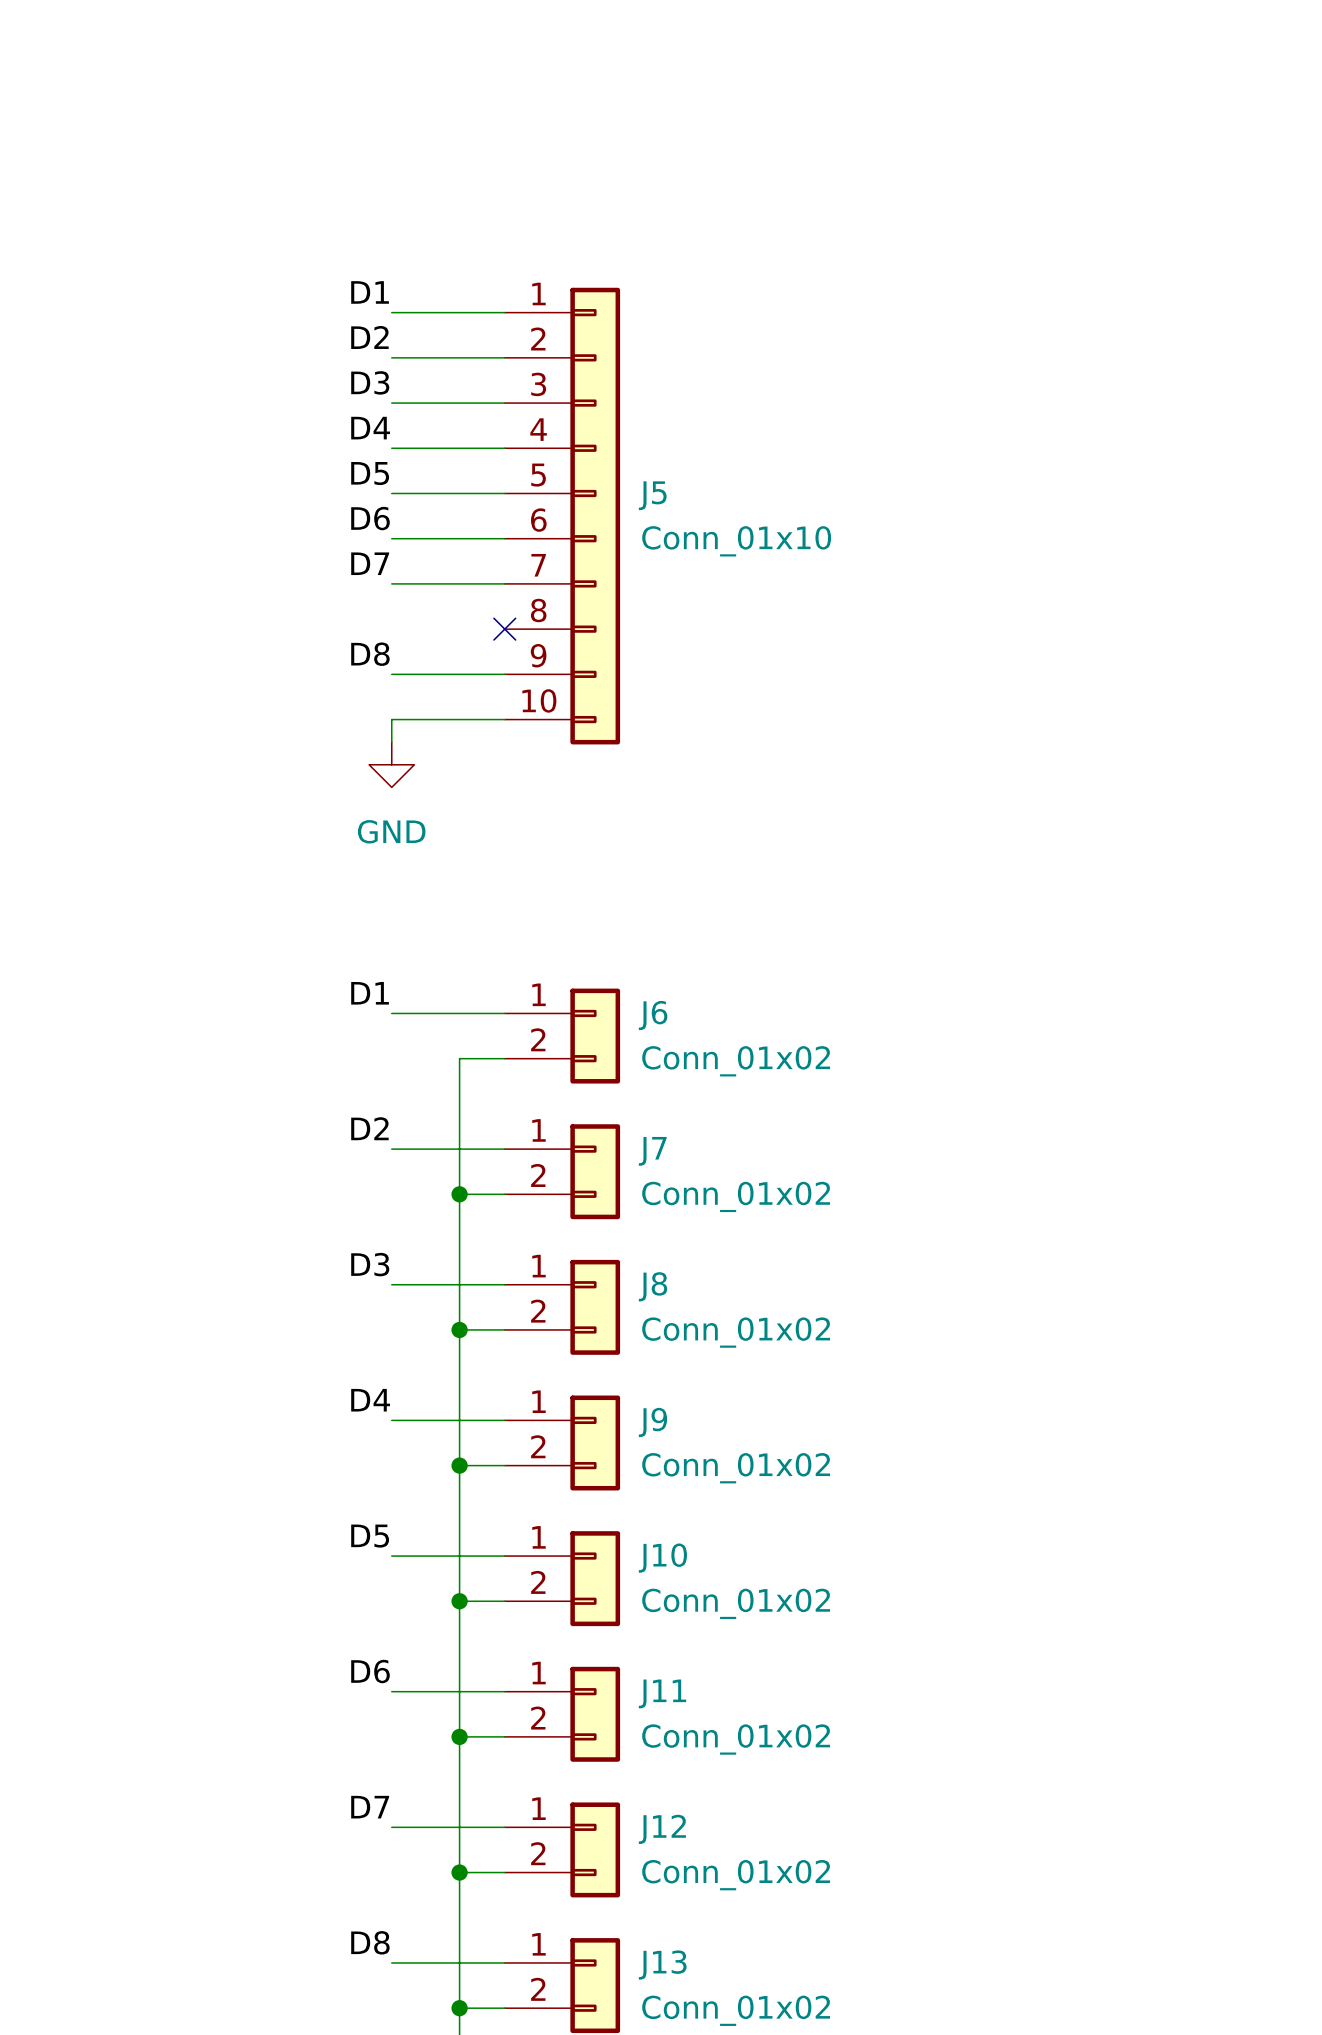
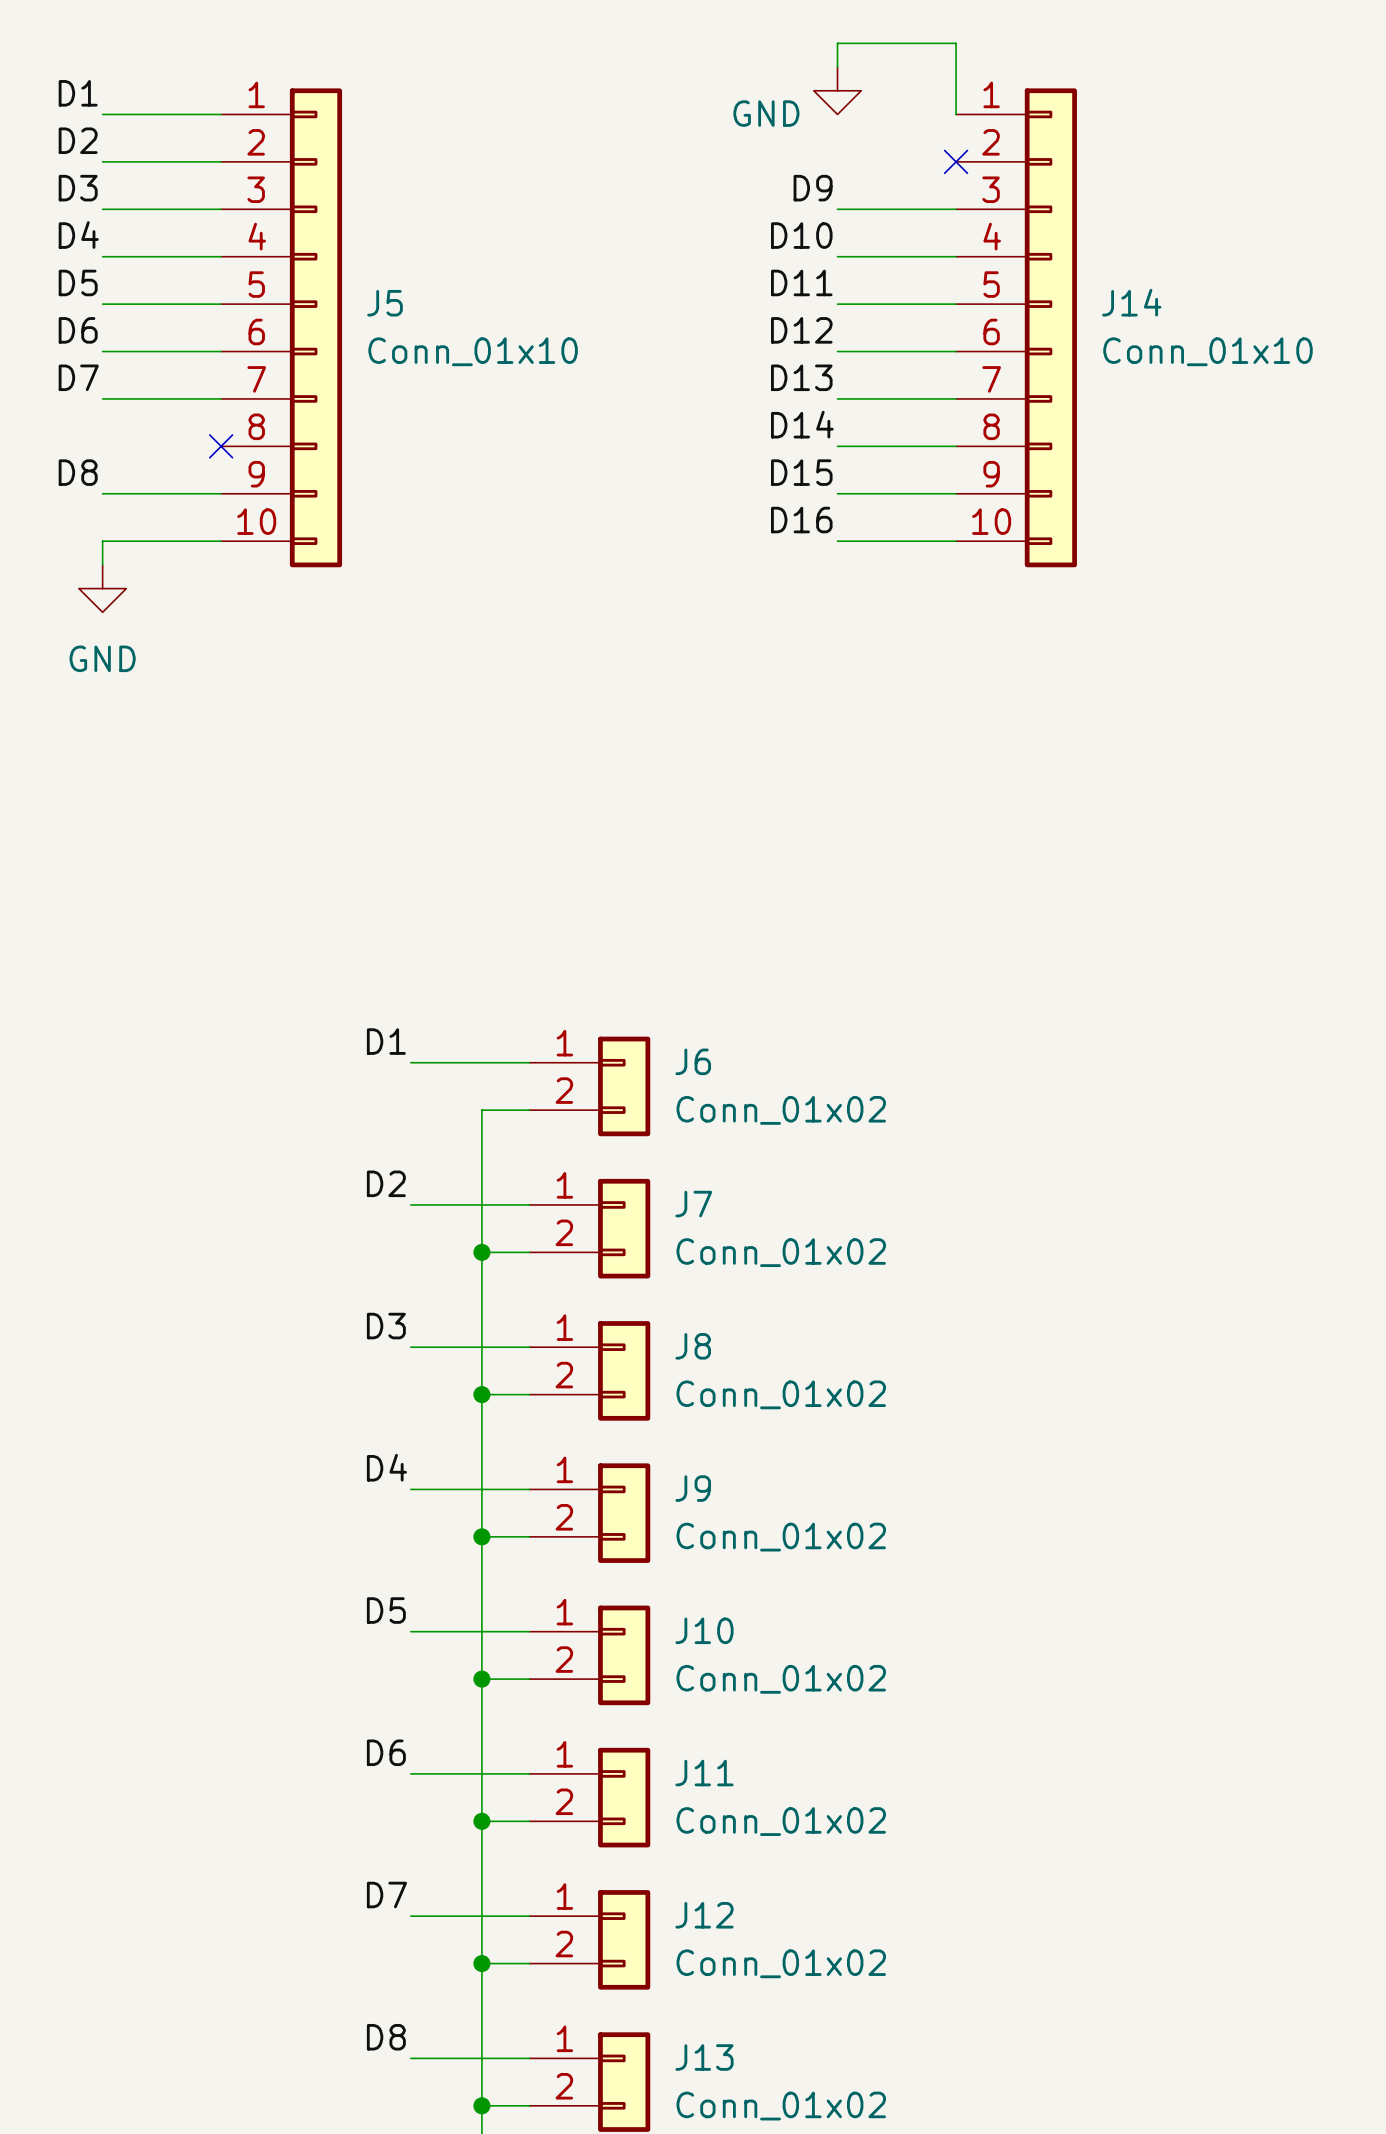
wire: none -> (837, 67) (837, 43) (956, 43) (956, 114)
power symbol: none -> GND (837, 90)
no-connect mark: none -> (956, 161)
label: none -> D9 (813, 188)
wire: none -> (837, 209) (956, 209)
label: none -> D10 (801, 235)
wire: none -> (837, 256) (956, 256)
label: none -> D11 (801, 282)
wire: none -> (837, 304) (956, 304)
label position: D1 (370, 292) -> D1 (78, 93)
wire: (391, 312) (504, 312) -> (102, 114) (221, 114)
J14: none -> Conn_01x10 (1016, 327)
label: none -> D12 (801, 330)
wire: none -> (837, 351) (956, 351)
label position: D2 (369, 337) -> D2 (78, 140)
wire: (391, 357) (504, 357) -> (102, 161) (221, 161)
label: none -> D13 (801, 377)
wire: none -> (837, 398) (956, 398)
label position: D3 (370, 382) -> D3 (78, 188)
wire: (391, 403) (504, 403) -> (102, 209) (221, 209)
label: none -> D14 (802, 424)
no-connect mark: none -> (221, 446)
wire: none -> (837, 446) (956, 446)
label position: D4 (370, 428) -> D4 (78, 234)
wire: (391, 448) (504, 448) -> (102, 256) (221, 256)
label: none -> D15 (801, 472)
wire: none -> (837, 493) (956, 493)
label position: D5 (370, 473) -> D5 (78, 282)
wire: (391, 493) (504, 493) -> (102, 304) (221, 304)
label: none -> D16 (801, 520)
J5 position: (562, 516) -> (281, 327)
wire: none -> (837, 541) (956, 541)
label position: D6 (370, 518) -> D6 (78, 330)
wire: (391, 538) (504, 538) -> (102, 351) (221, 351)
label position: D7 (370, 563) -> D7 (78, 377)
wire: (391, 583) (504, 583) -> (102, 398) (221, 398)
no-connect mark: (504, 629) -> none
label position: D8 (370, 654) -> D8 (78, 472)
wire: (391, 674) (504, 674) -> (102, 493) (221, 493)
wire: (504, 719) (391, 719) (391, 742) -> (221, 541) (102, 541) (102, 564)
power symbol position: GND (391, 764) -> GND (102, 588)

